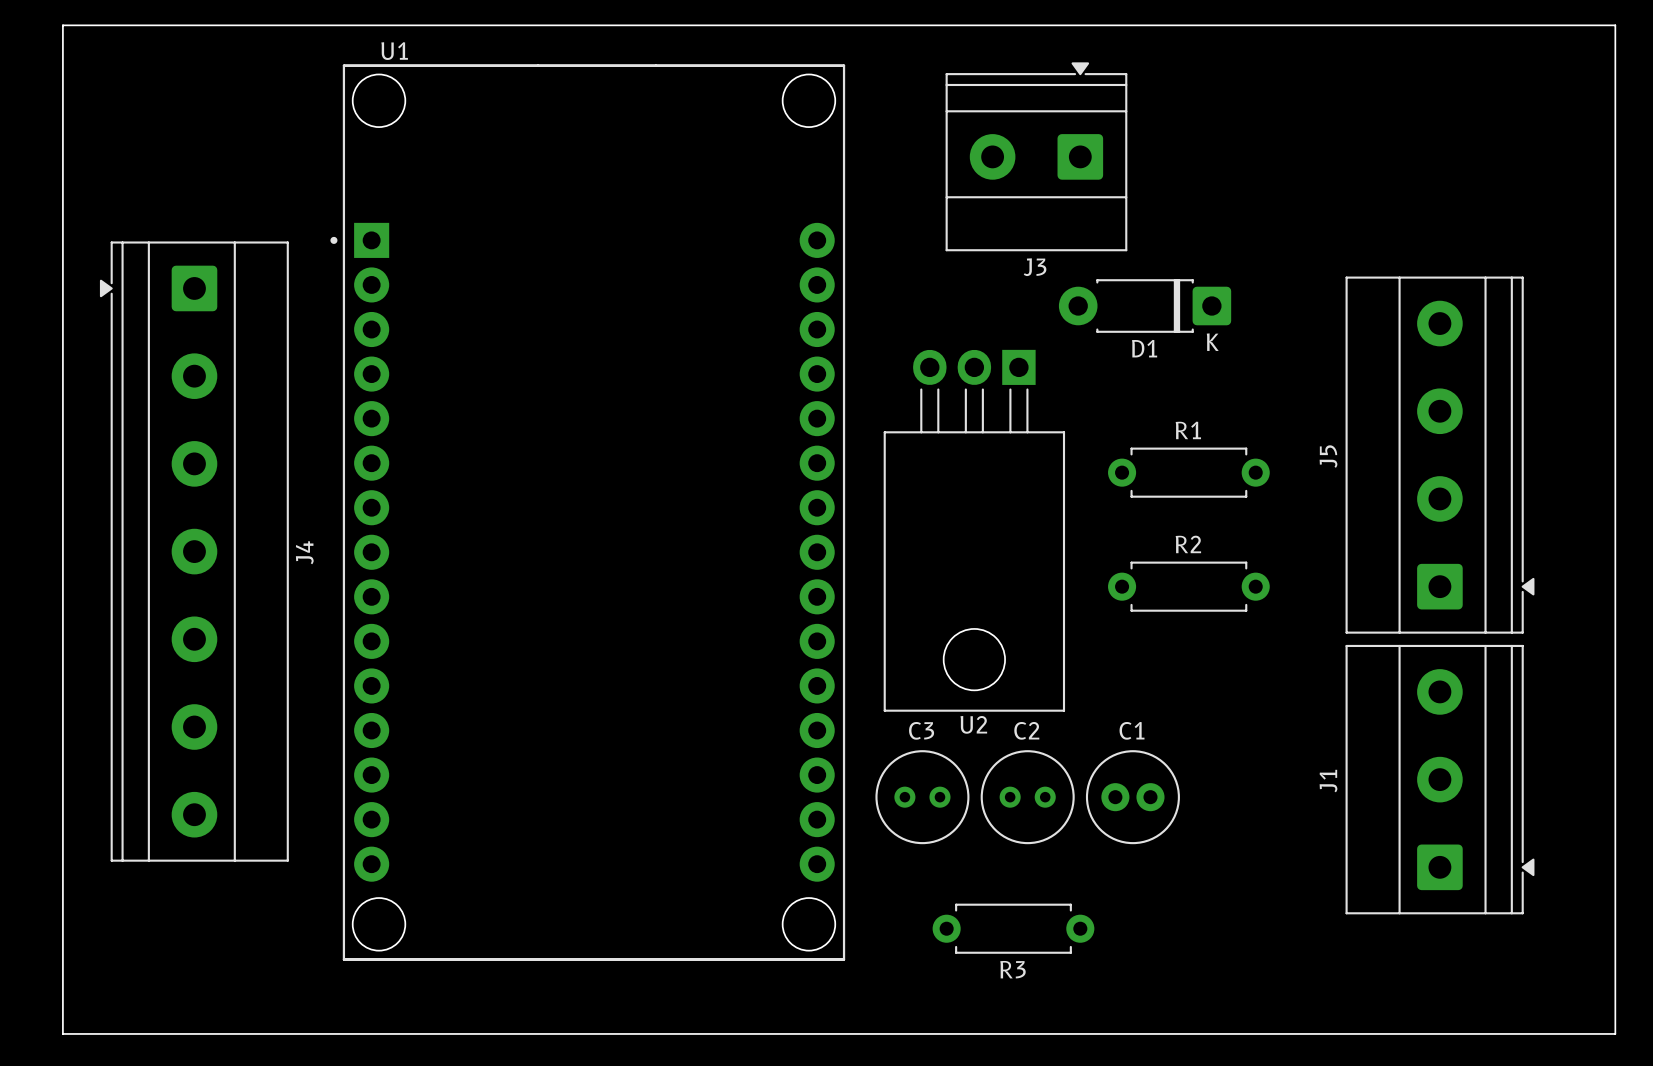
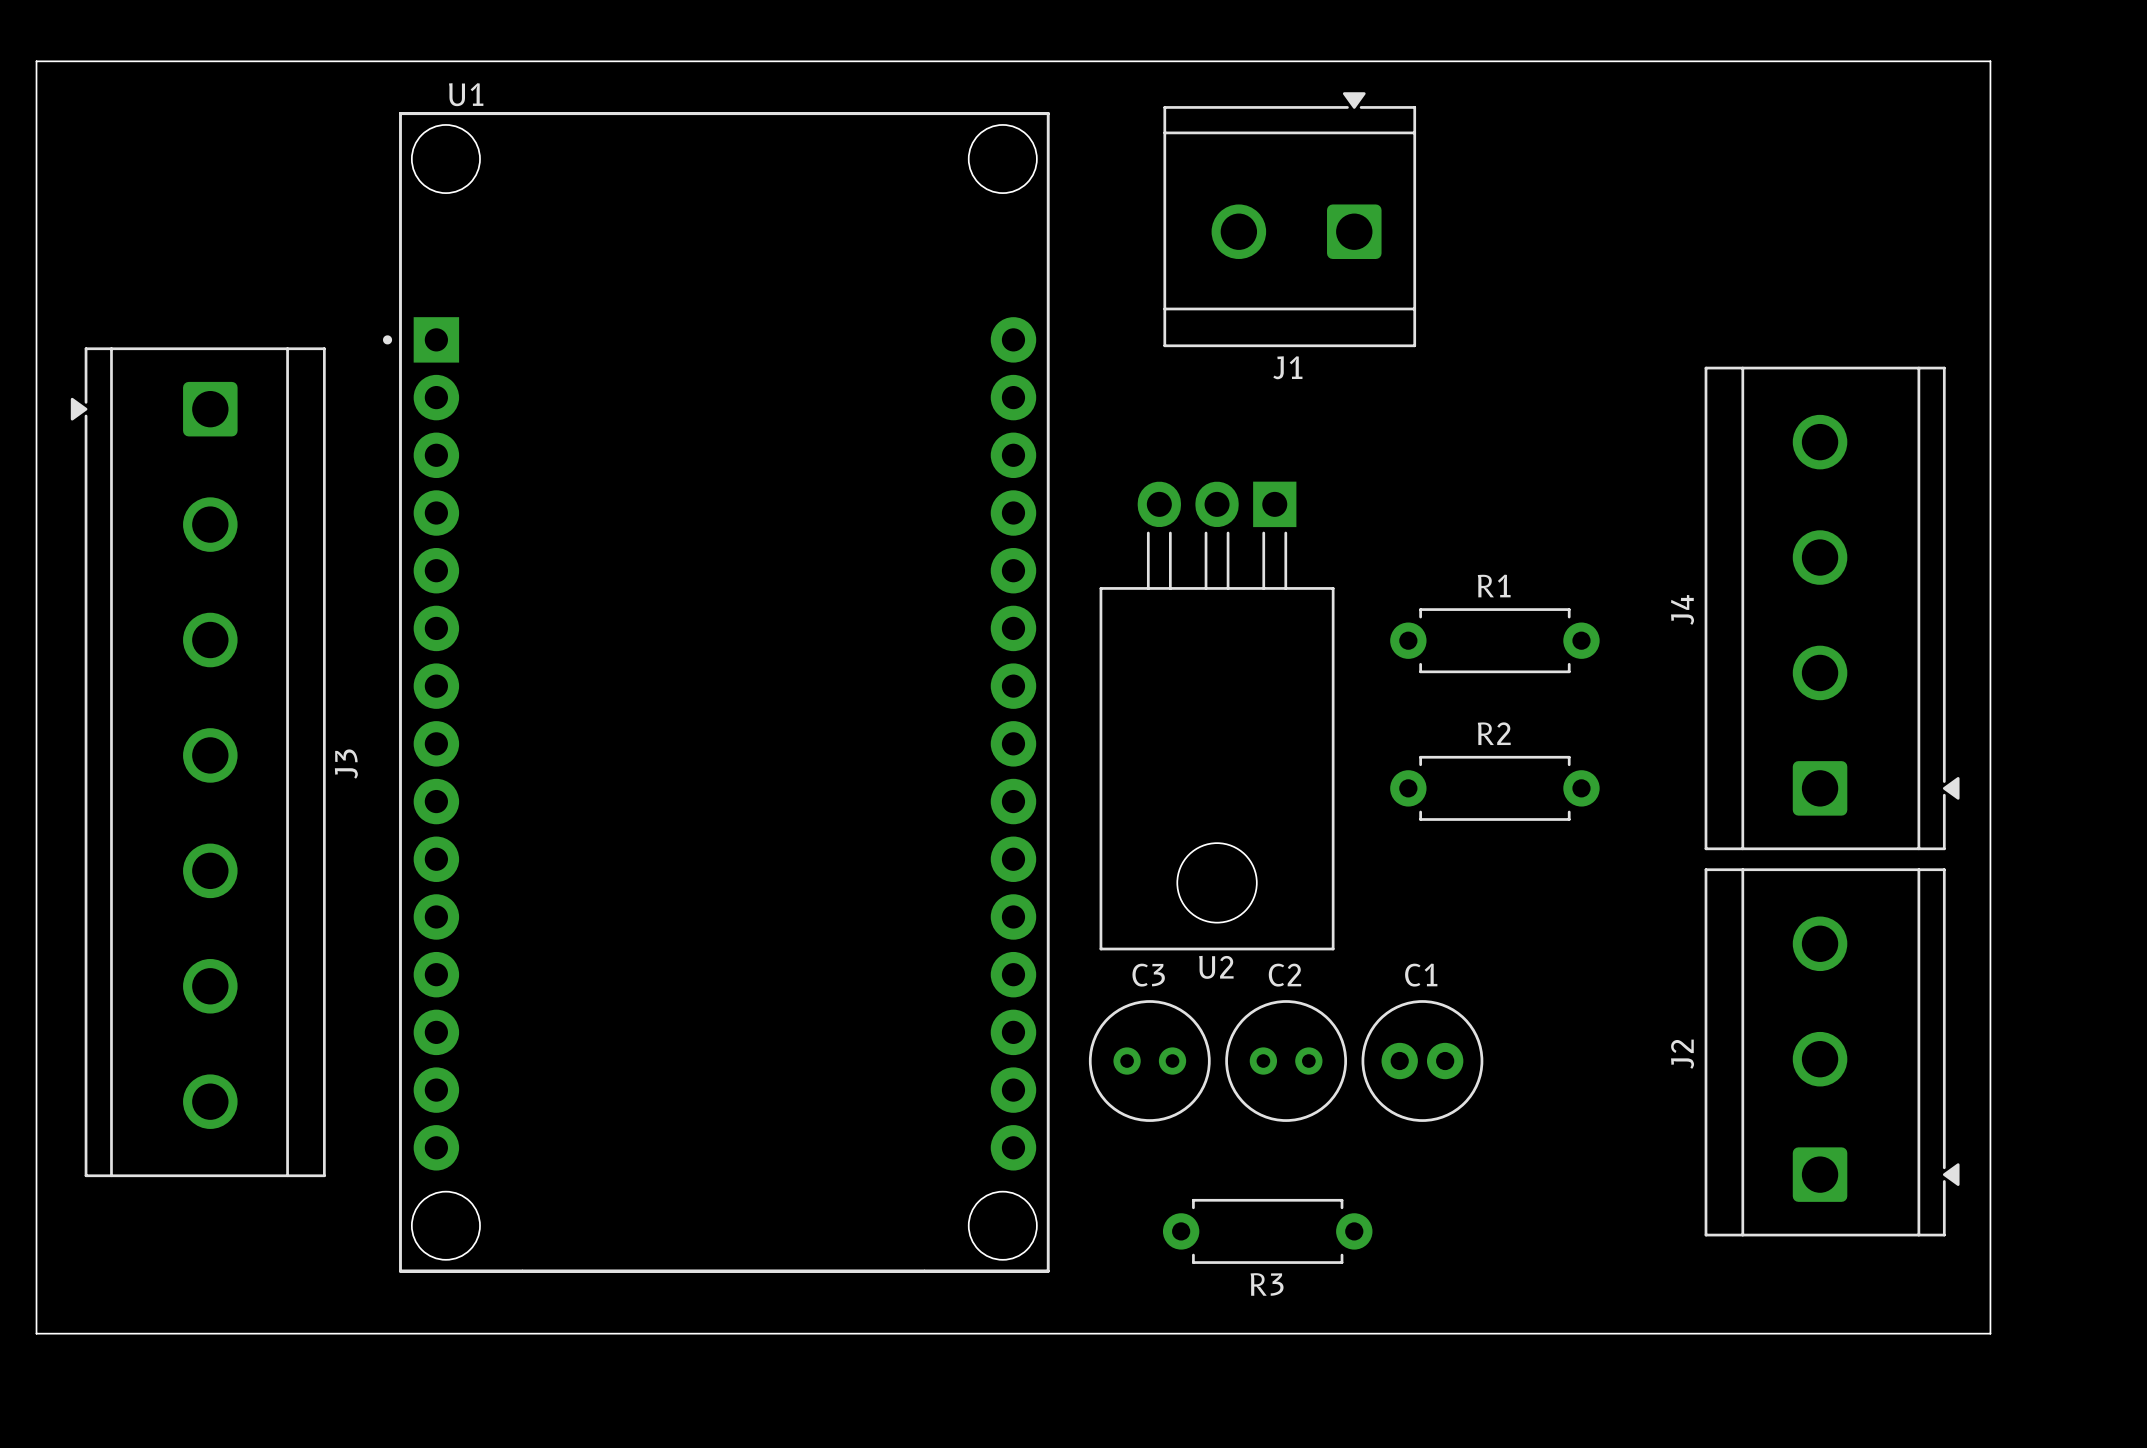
board edge: (1571, 25) (1615, 25) (1615, 1033) (62, 1033) (62, 1007) -> (1990, 61) (1990, 1333) (36, 1333)
J3 footprint: [945, 62, 1128, 252] -> [70, 347, 326, 1178]
J4 footprint: [99, 241, 289, 862] -> [1704, 366, 1960, 851]
J3 name position: J3 (1035, 267) -> J3 (346, 764)
D1: (1145, 306) -> none
J5: (1440, 455) -> none
J4 name position: J4 (304, 552) -> J4 (1682, 609)
J1 footprint: [1345, 644, 1535, 915] -> [1163, 92, 1417, 348]
J1 name position: J1 (1328, 781) -> J1 (1287, 367)
J2: none -> (1832, 1052)

